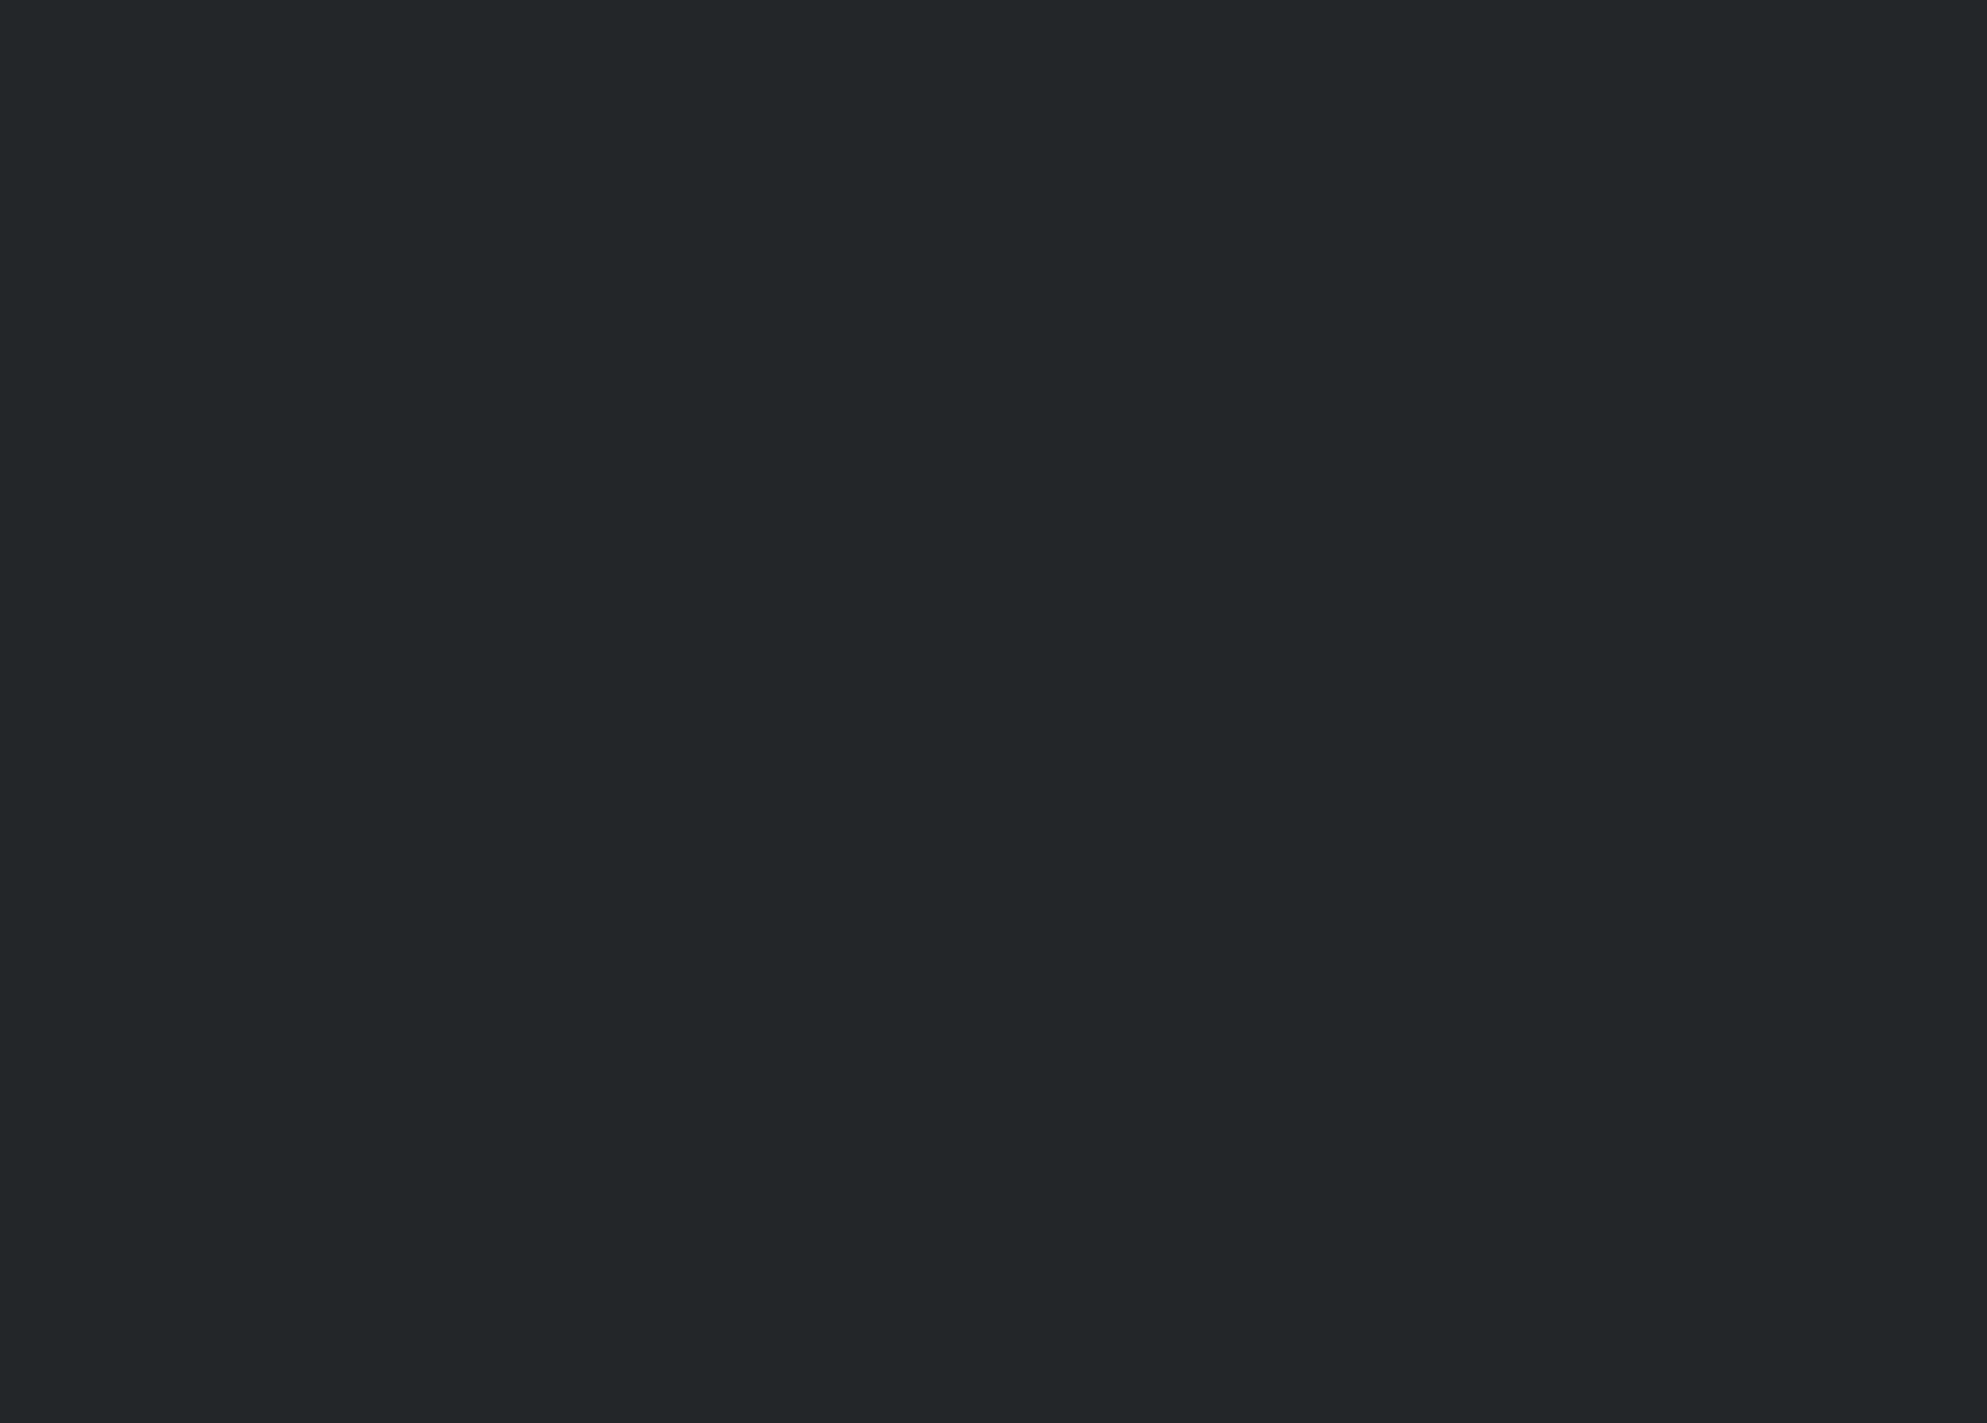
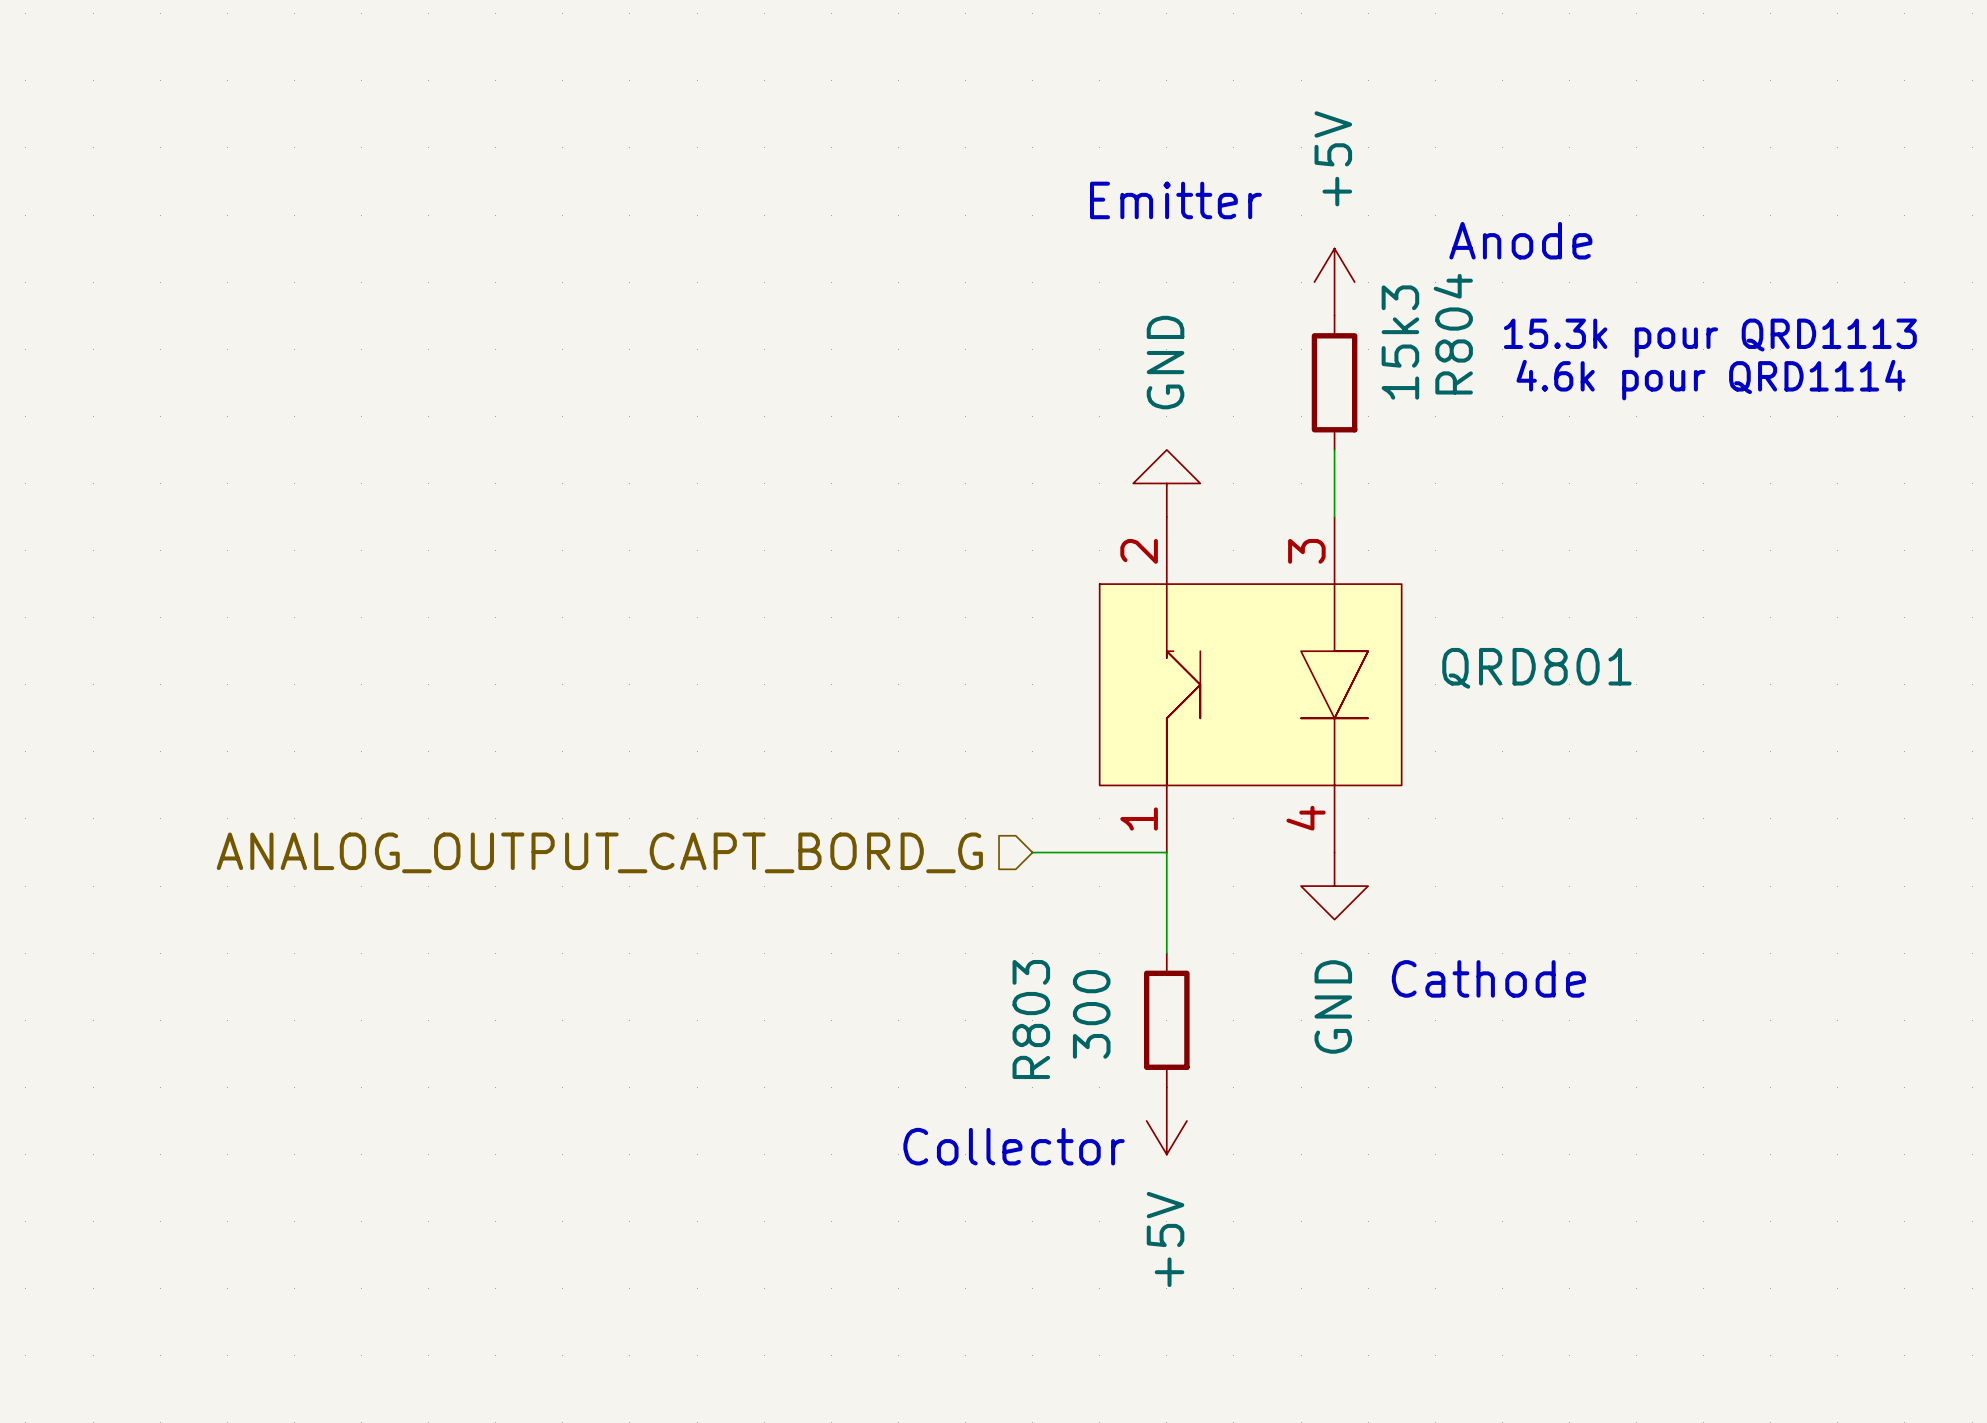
text: none -> Emitter (1175, 200)
text: none -> Anode (1520, 240)
power symbol: none -> +5V (1334, 282)
text: none -> 15.3k pour QRD1113 (1710, 338)
text: none -> 4.6k pour QRD1114 (1710, 380)
R804: none -> 15k3 (1334, 382)
wire: none -> (1334, 449) (1334, 517)
power symbol: none -> GND (1166, 483)
QRD801: none -> (1250, 684)
hierarchical label: none -> ANALOG_OUTPUT_CAPT_BORD_G (599, 852)
wire: none -> (1032, 852) (1166, 852) (1166, 953)
power symbol: none -> GND (1334, 886)
text: none -> Cathode (1488, 978)
R803: none -> 300 (1166, 1020)
power symbol: none -> +5V (1166, 1120)
text: none -> Collector (1014, 1146)

